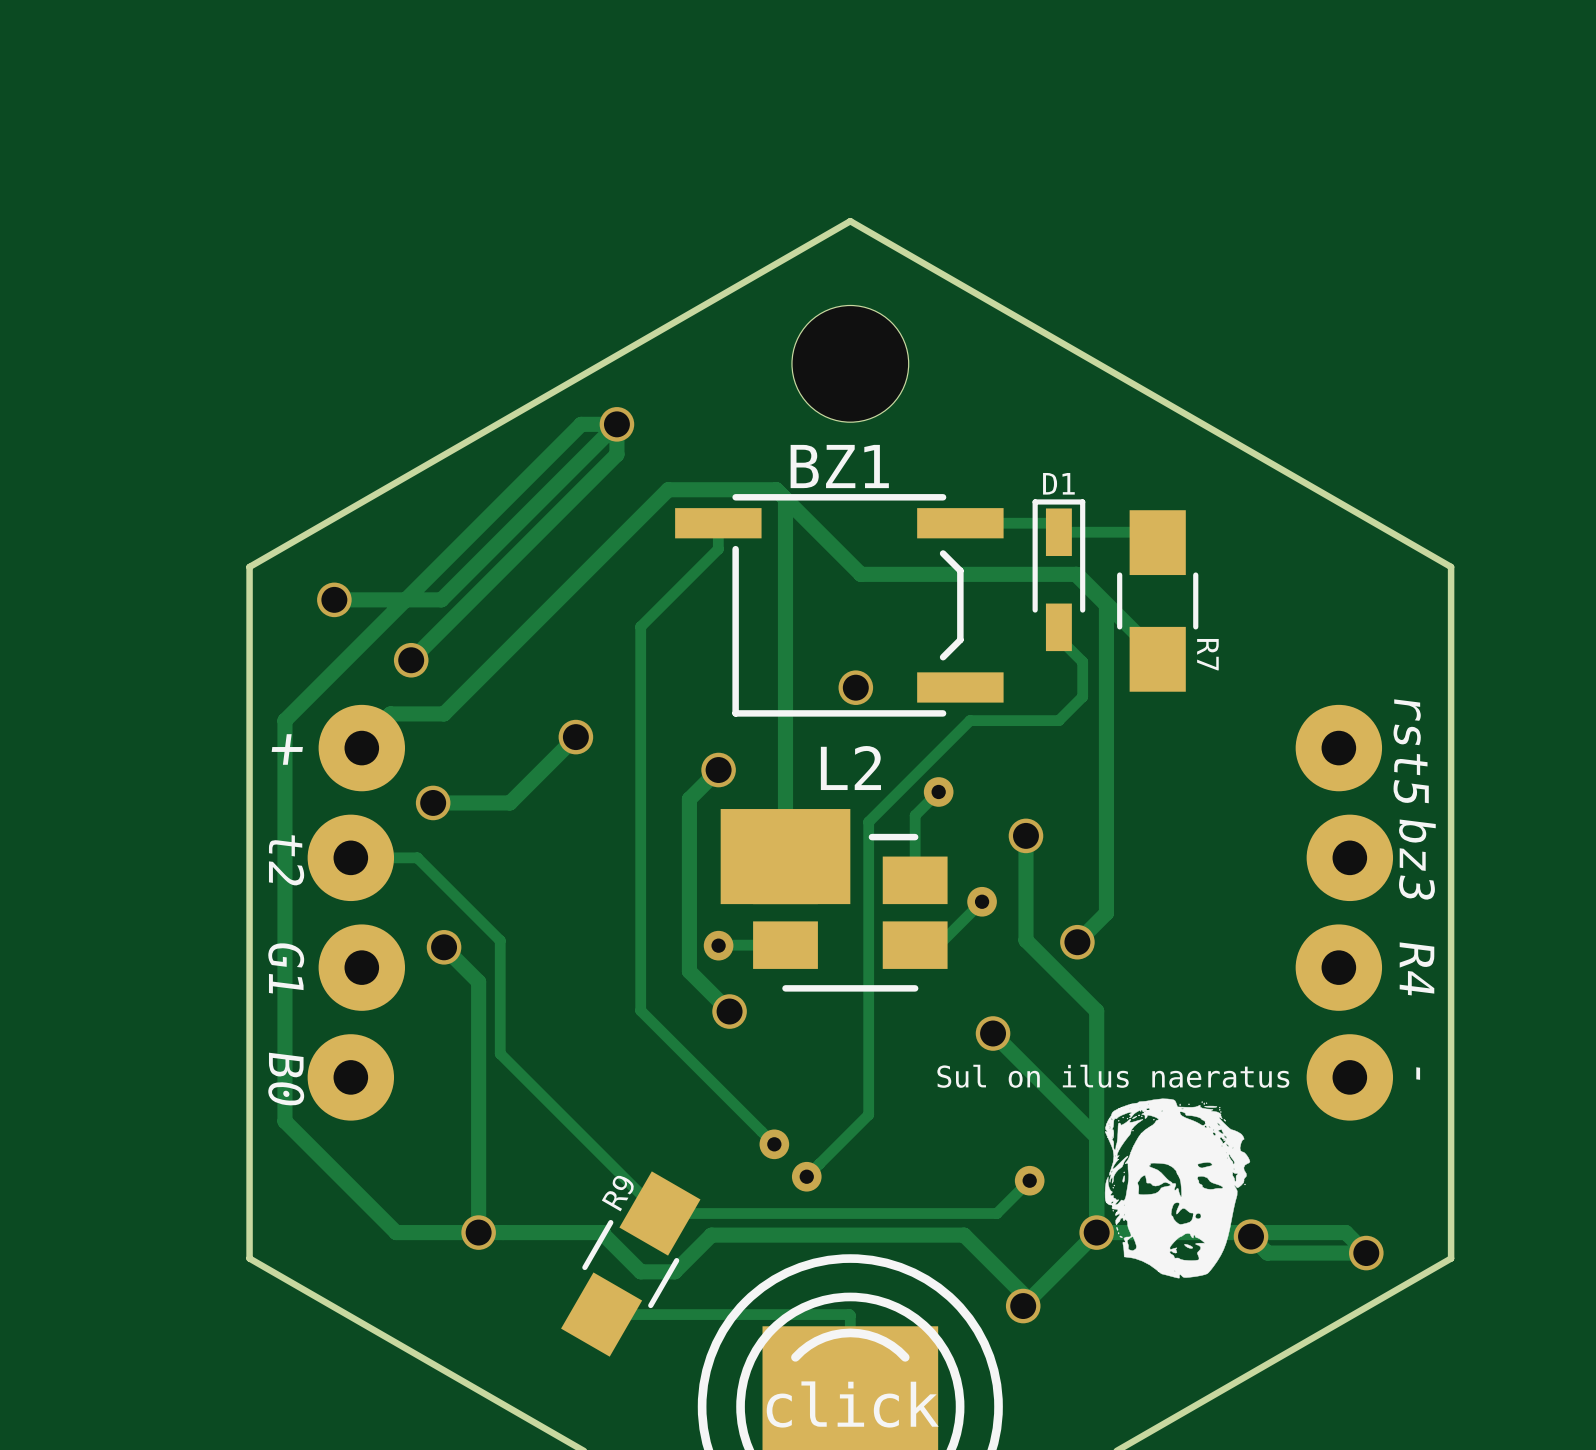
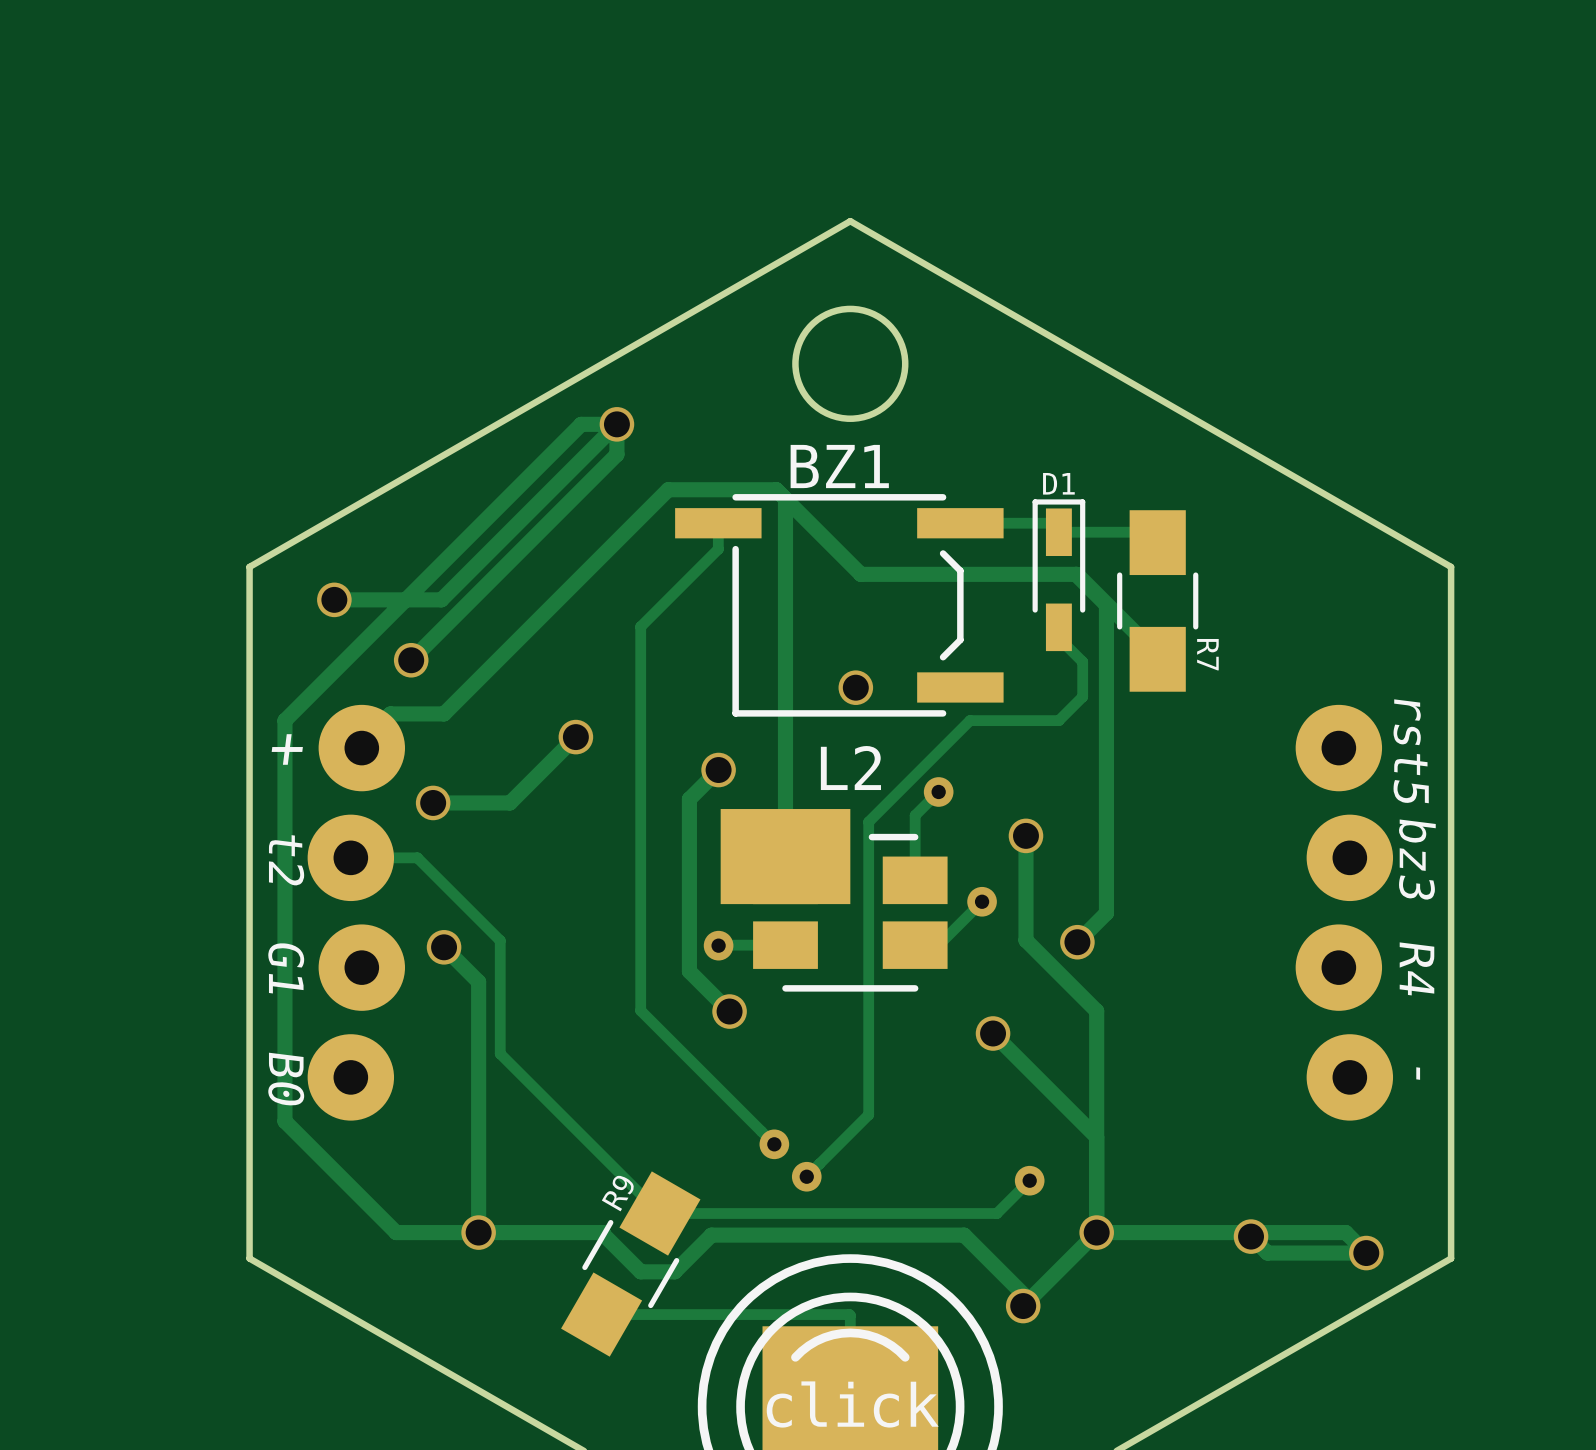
round board edge: none -> [792, 305, 909, 422]
part: (850, 363) -> none
text: Sul on ilus naeratus (1113, 1076) -> none
drawing: [1104, 1098, 1251, 1279] -> none

